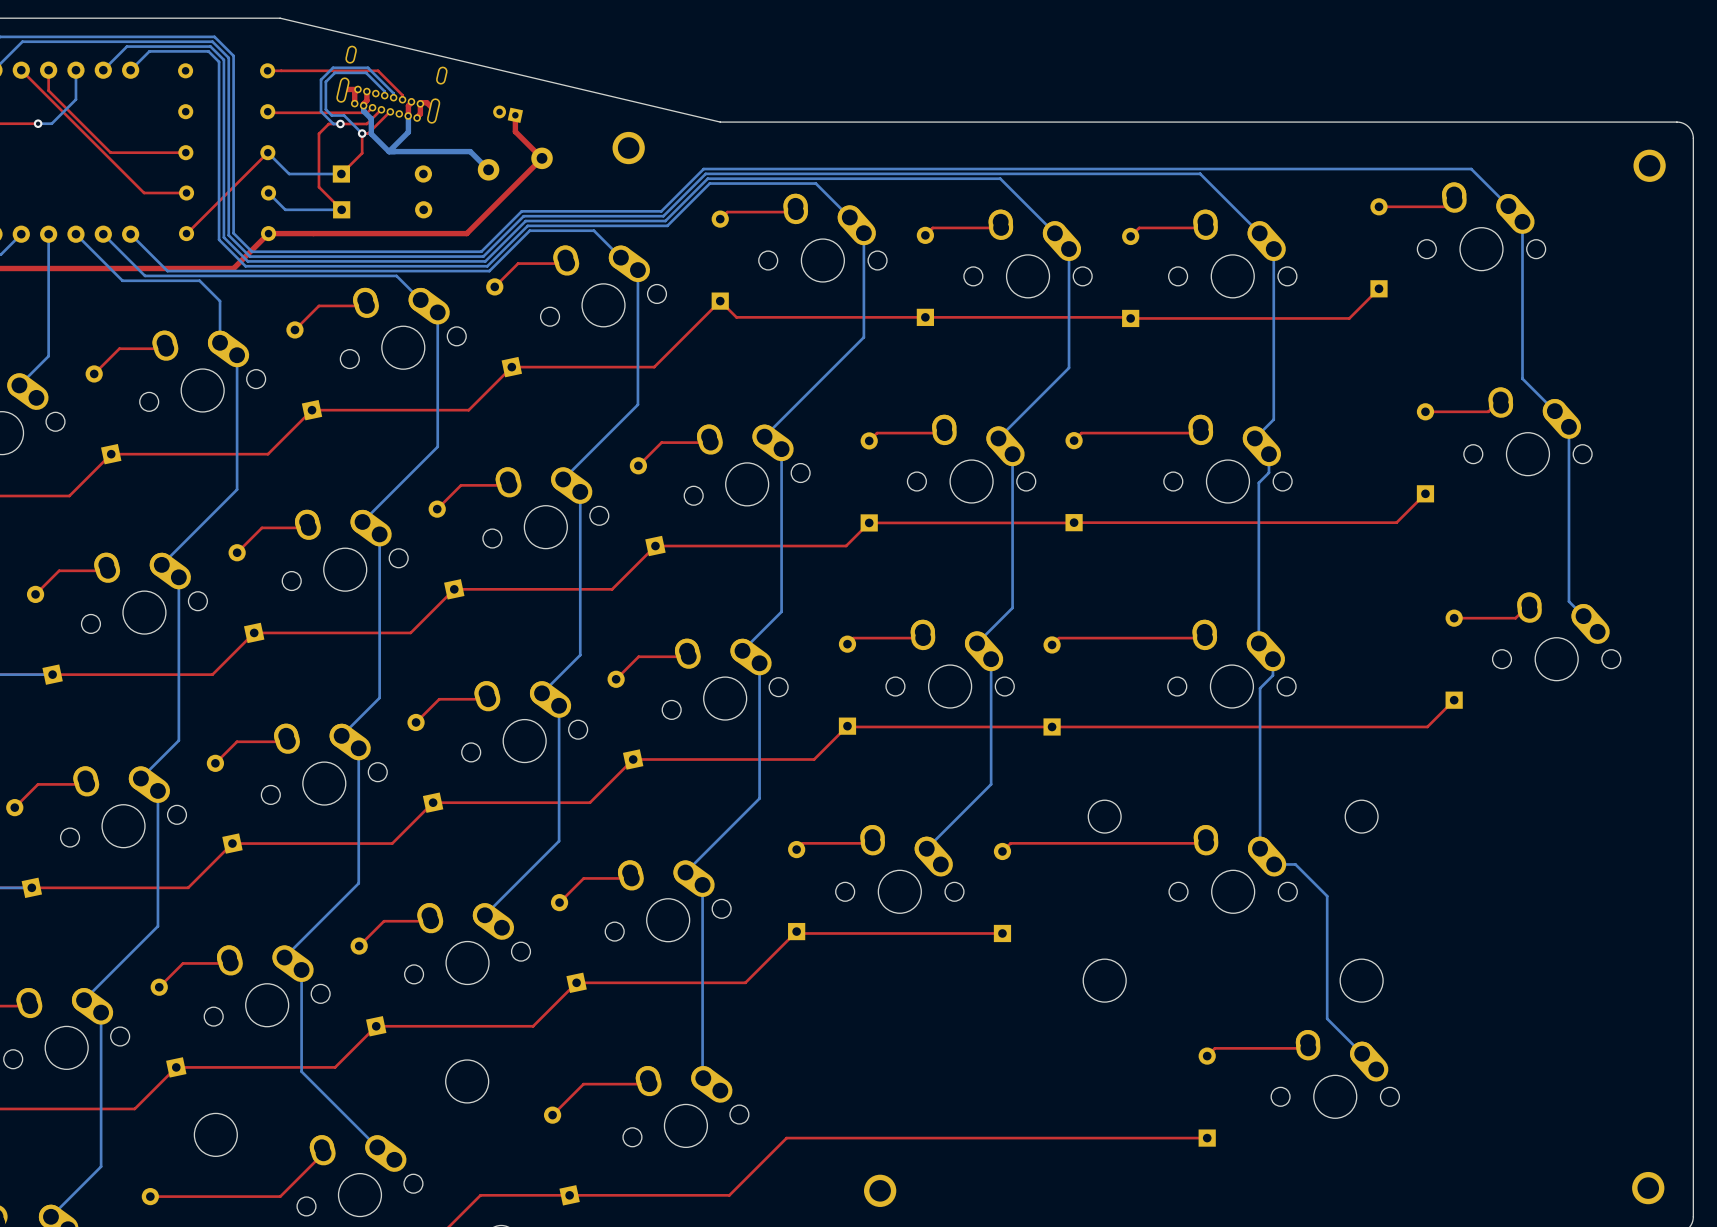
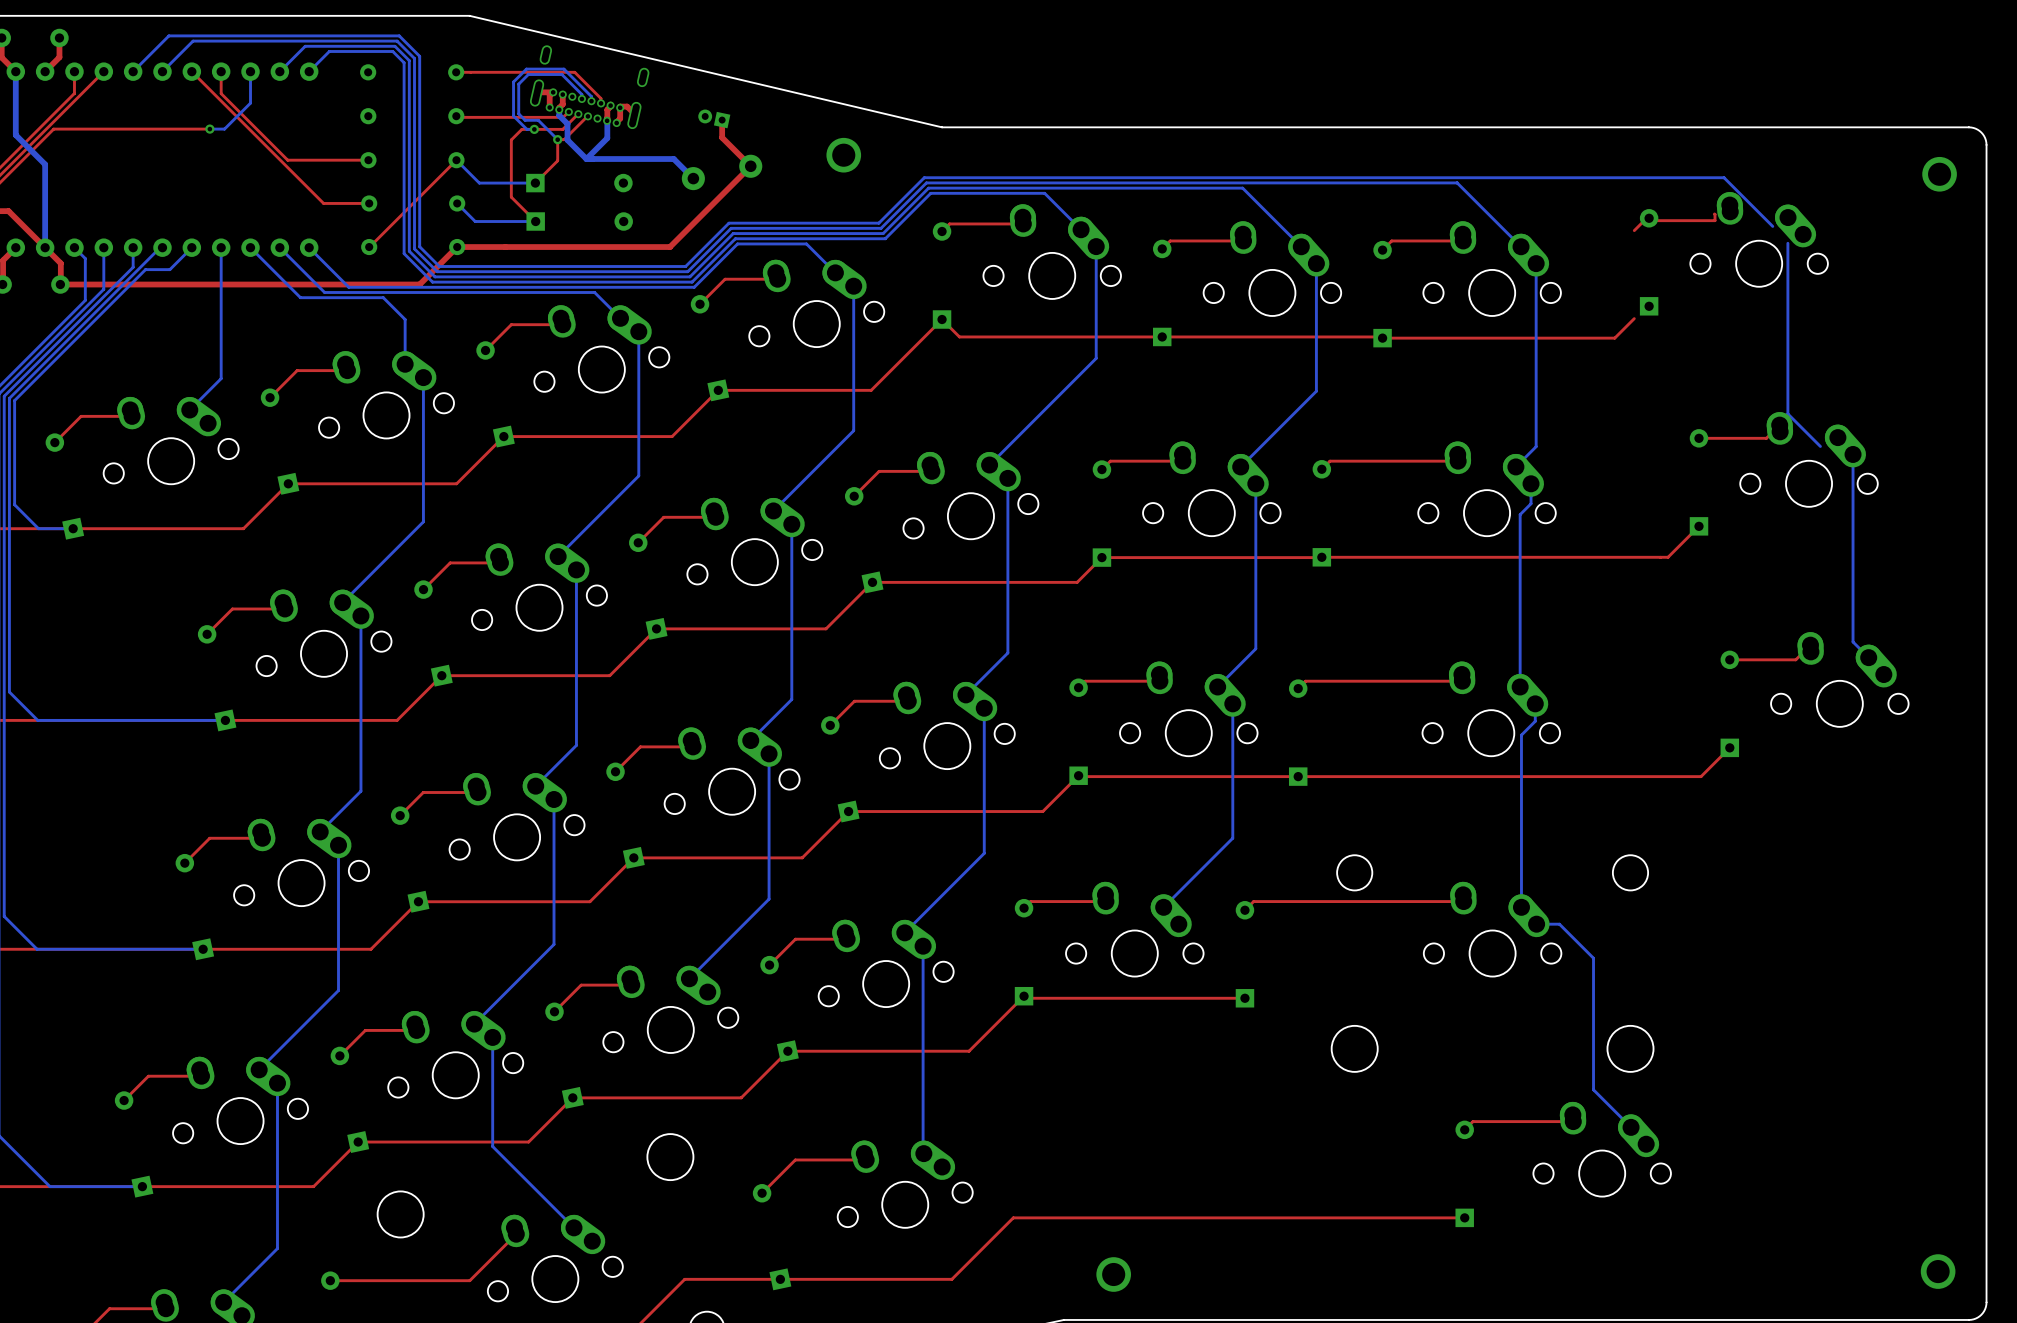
bottom track: (1448, 169) (1471, 169) (1508, 206) -> (1724, 177) (1772, 226)
top track: (1454, 200) (1448, 206) (1379, 206) -> none
top track: none -> (1714, 213) (1715, 220) (1644, 220) (1634, 230)
bottom track: (1522, 221) (1522, 378) (1554, 411) -> none
bottom track: none -> (1787, 243) (1787, 413) (1820, 446)
top track: (1379, 288) (1349, 318) (1347, 318) -> (1634, 318) (1614, 338)

